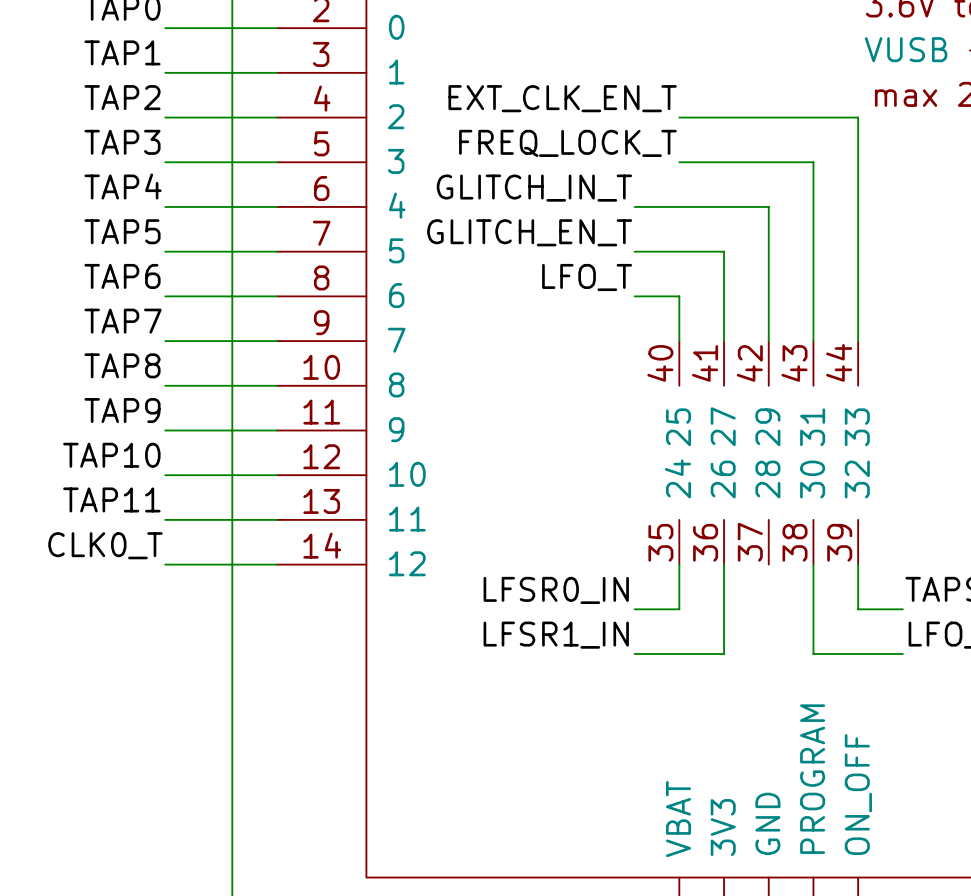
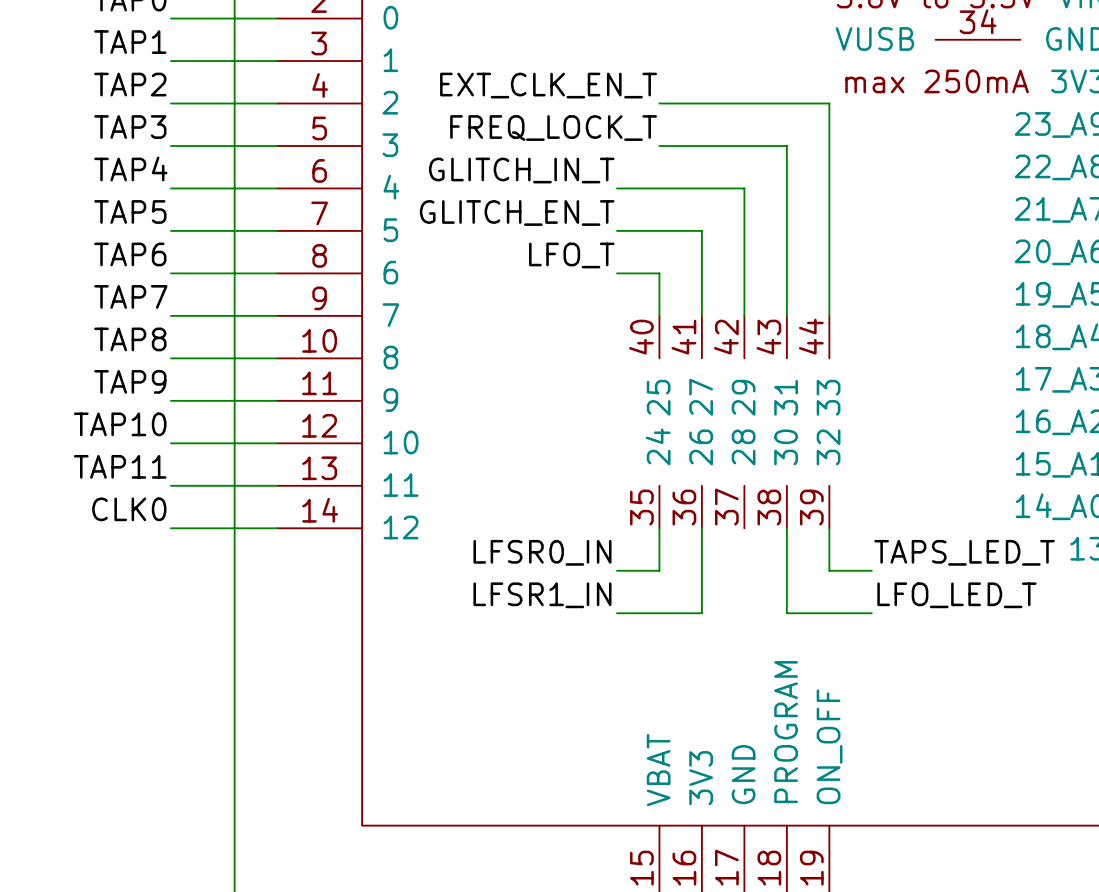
label: CLK0_T (105, 545) -> CLK0 (129, 509)

